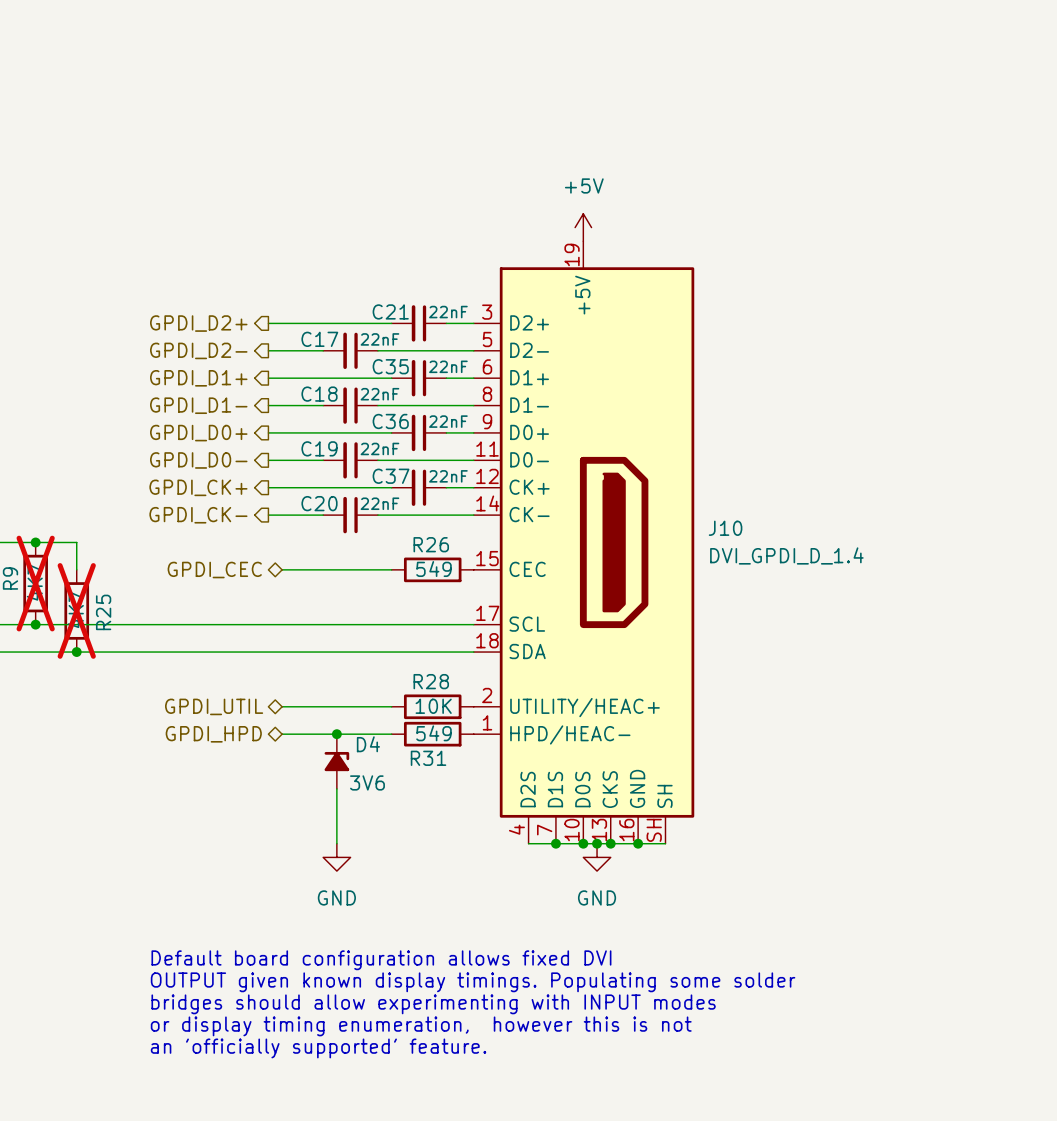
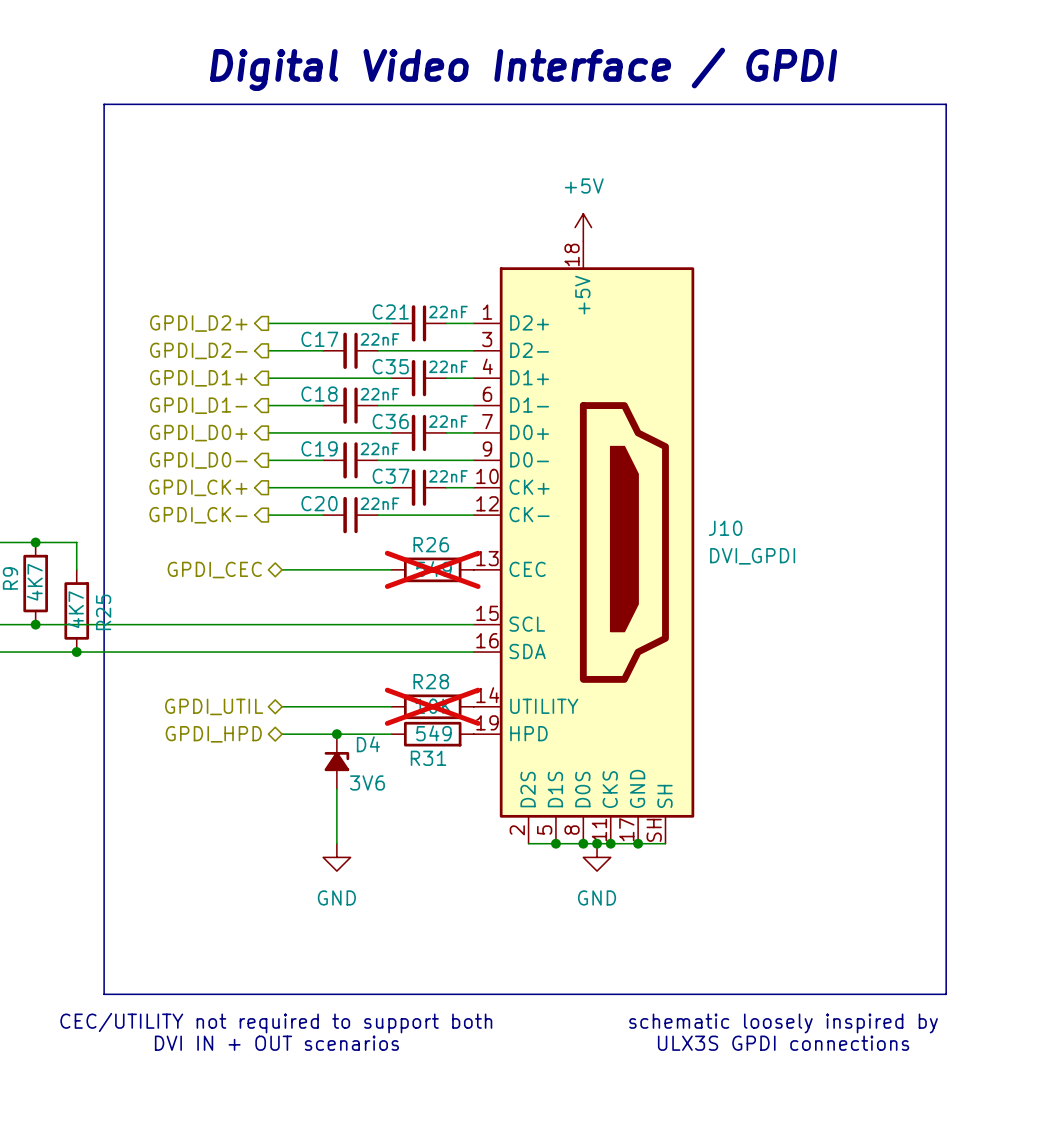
text: none -> Digital Video Interface / GPDI (523, 69)
line: none -> (104, 104) (946, 104) (946, 994) (104, 994) (104, 104)
J10 symbol: [473, 241, 695, 844] -> [473, 241, 695, 844]
J10 value: DVI_GPDI_D_1.4 (786, 555) -> DVI_GPDI (752, 556)
R26 do-not-place cross: none -> (432, 569)
R9 do-not-place cross: (35, 583) -> none
R25 do-not-place cross: (76, 610) -> none
R28 do-not-place cross: none -> (432, 706)
text: Default board configuration allows fixed DVI (381, 960) -> none
text: OUTPUT given known display timings. Populating some solder (473, 982) -> none
text: bridges should allow experimenting with INPUT modes (433, 1004) -> none
text: none -> CEC/UTILITY not required to support both (276, 1023)
text: none -> schematic loosely inspired by (783, 1023)
text: or display timing enumeration, however this is not (421, 1026) -> none
text: none -> DVI IN + OUT scenarios (276, 1043)
text: none -> ULX3S GPDI connections (783, 1043)
text: an 'officially supported' feature. (318, 1048) -> none

